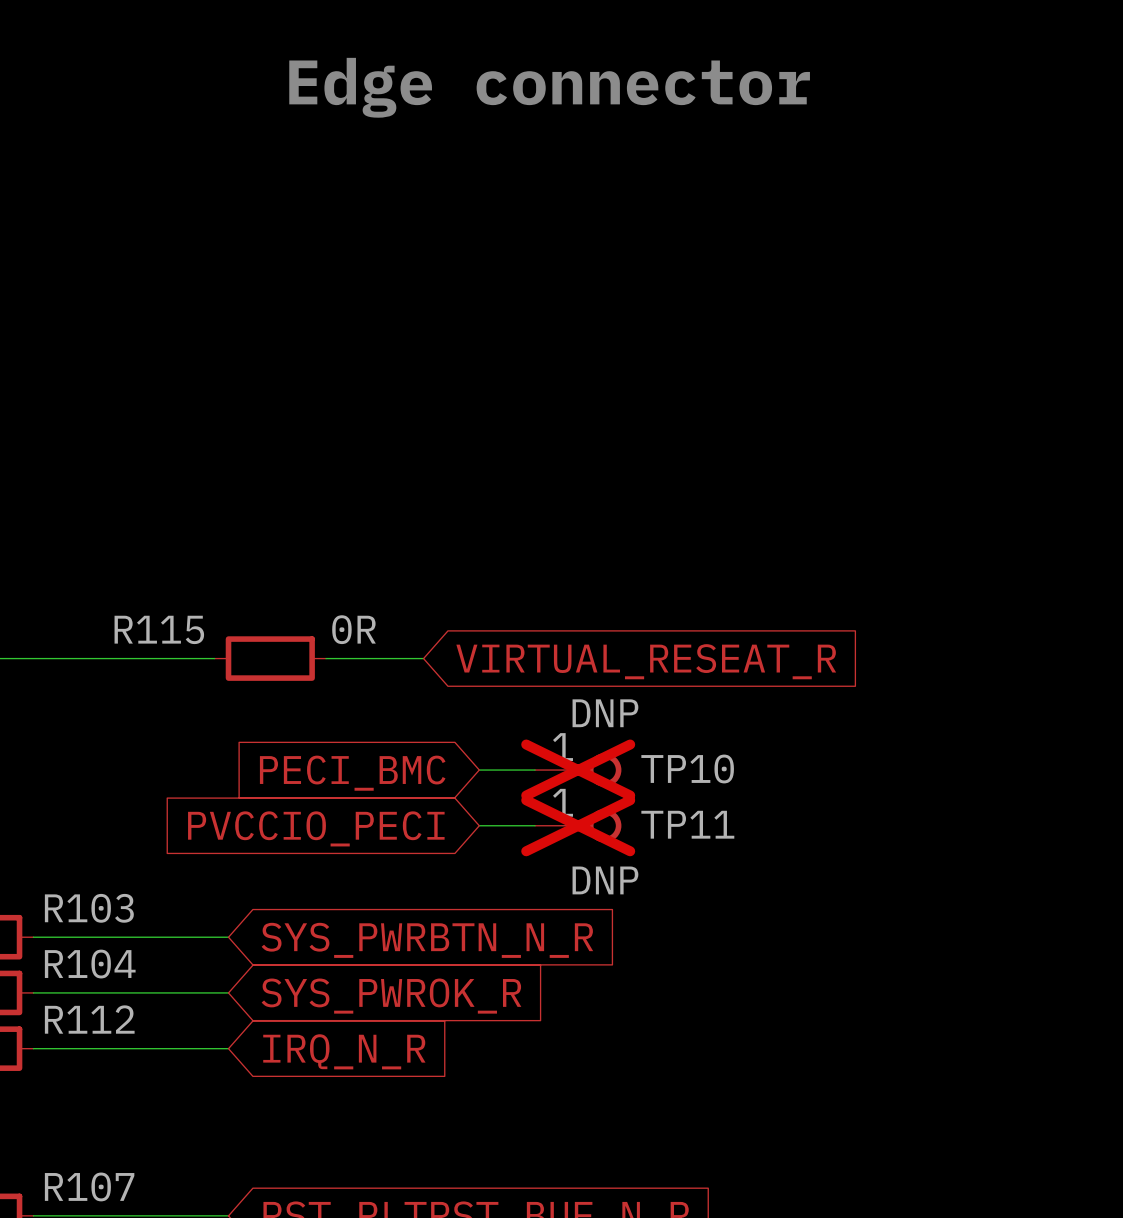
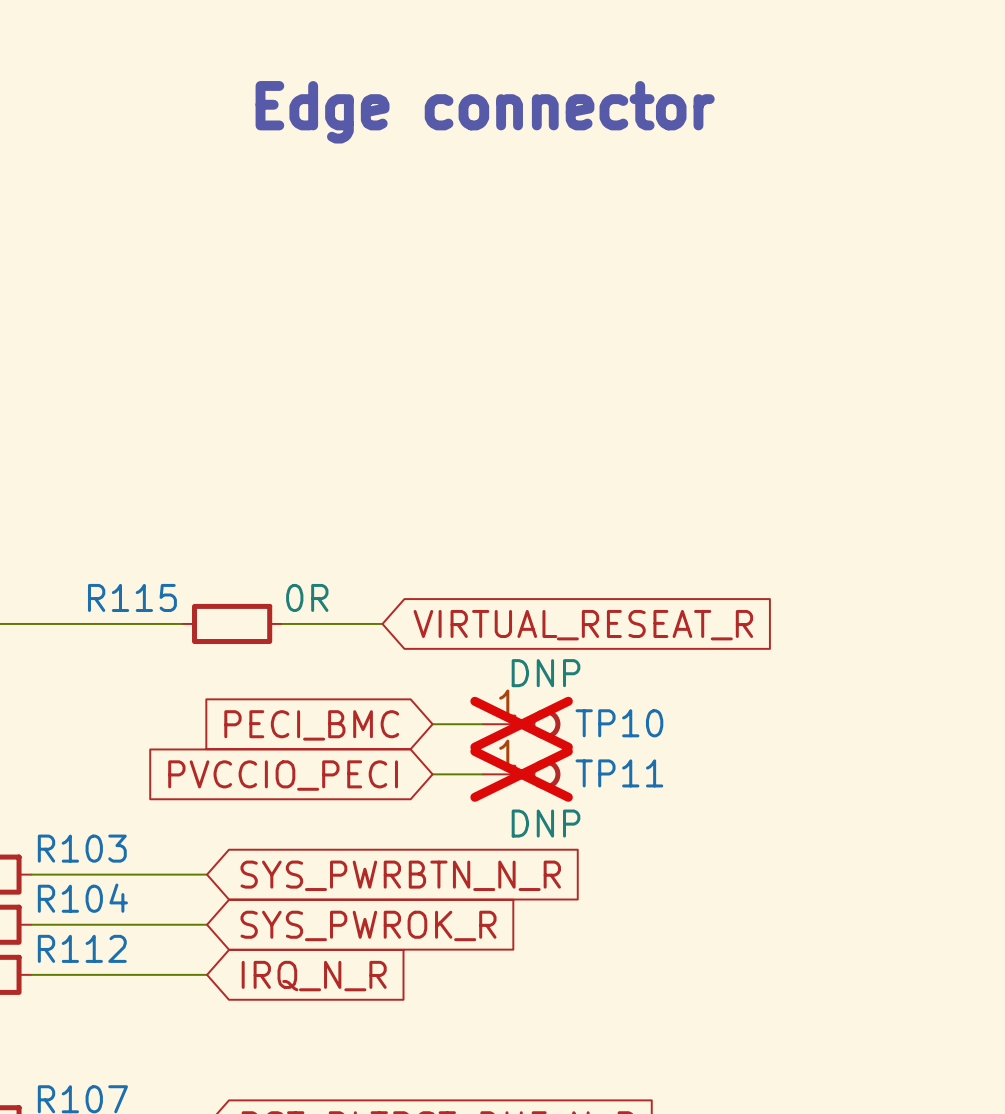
text position: Edge connector (549, 87) -> Edge connector (485, 112)
R115 position: (270, 658) -> (232, 623)

